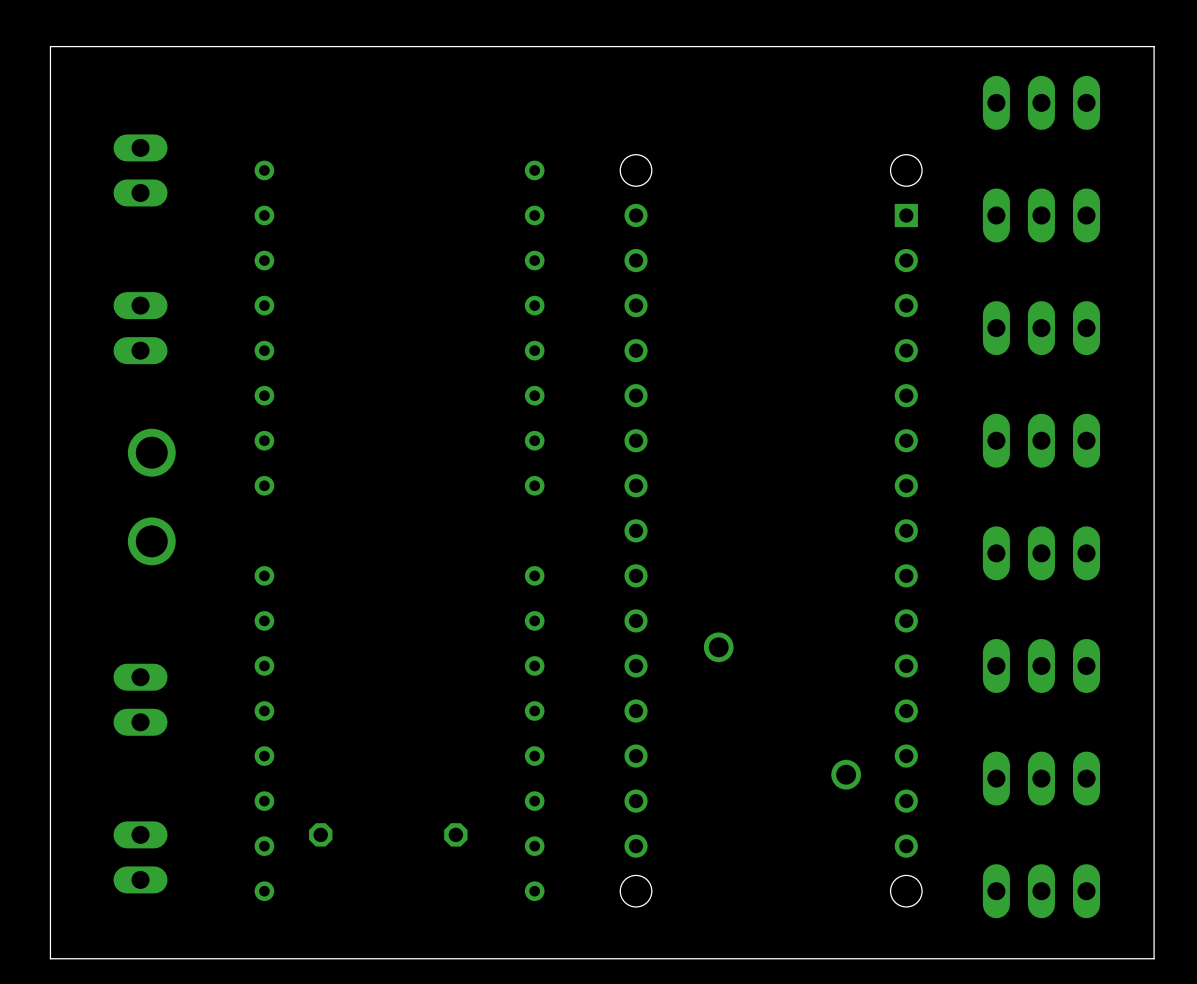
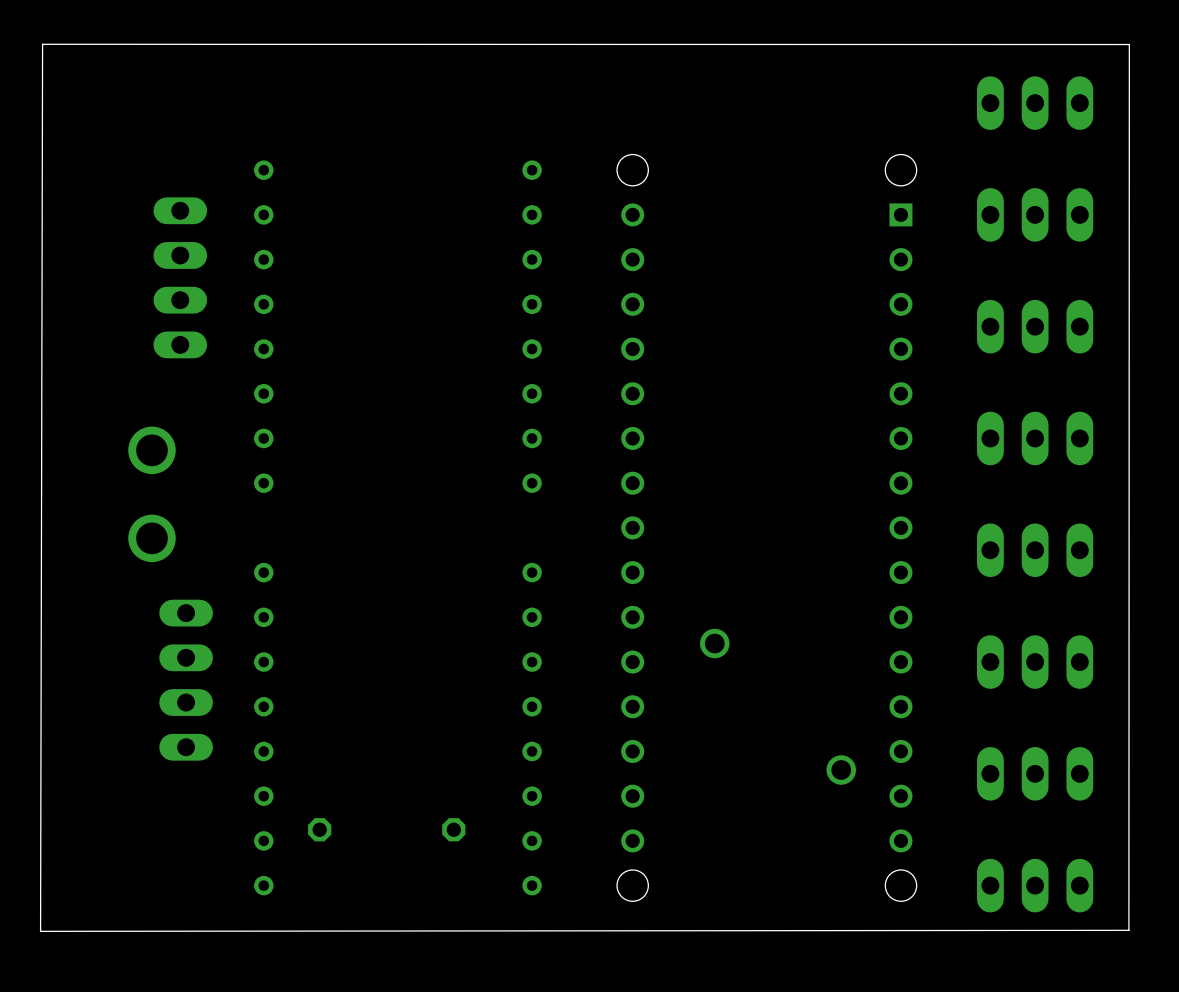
board edge: (1154, 46) (50, 46) (50, 958) (1154, 958) (1154, 46) -> (42, 44) (1129, 44) (1128, 930) (40, 931) (42, 44)
part: (140, 170) -> none
part: none -> (180, 277)
part: (140, 328) -> none
part: none -> (186, 680)
part: (140, 699) -> none
part: (140, 857) -> none

